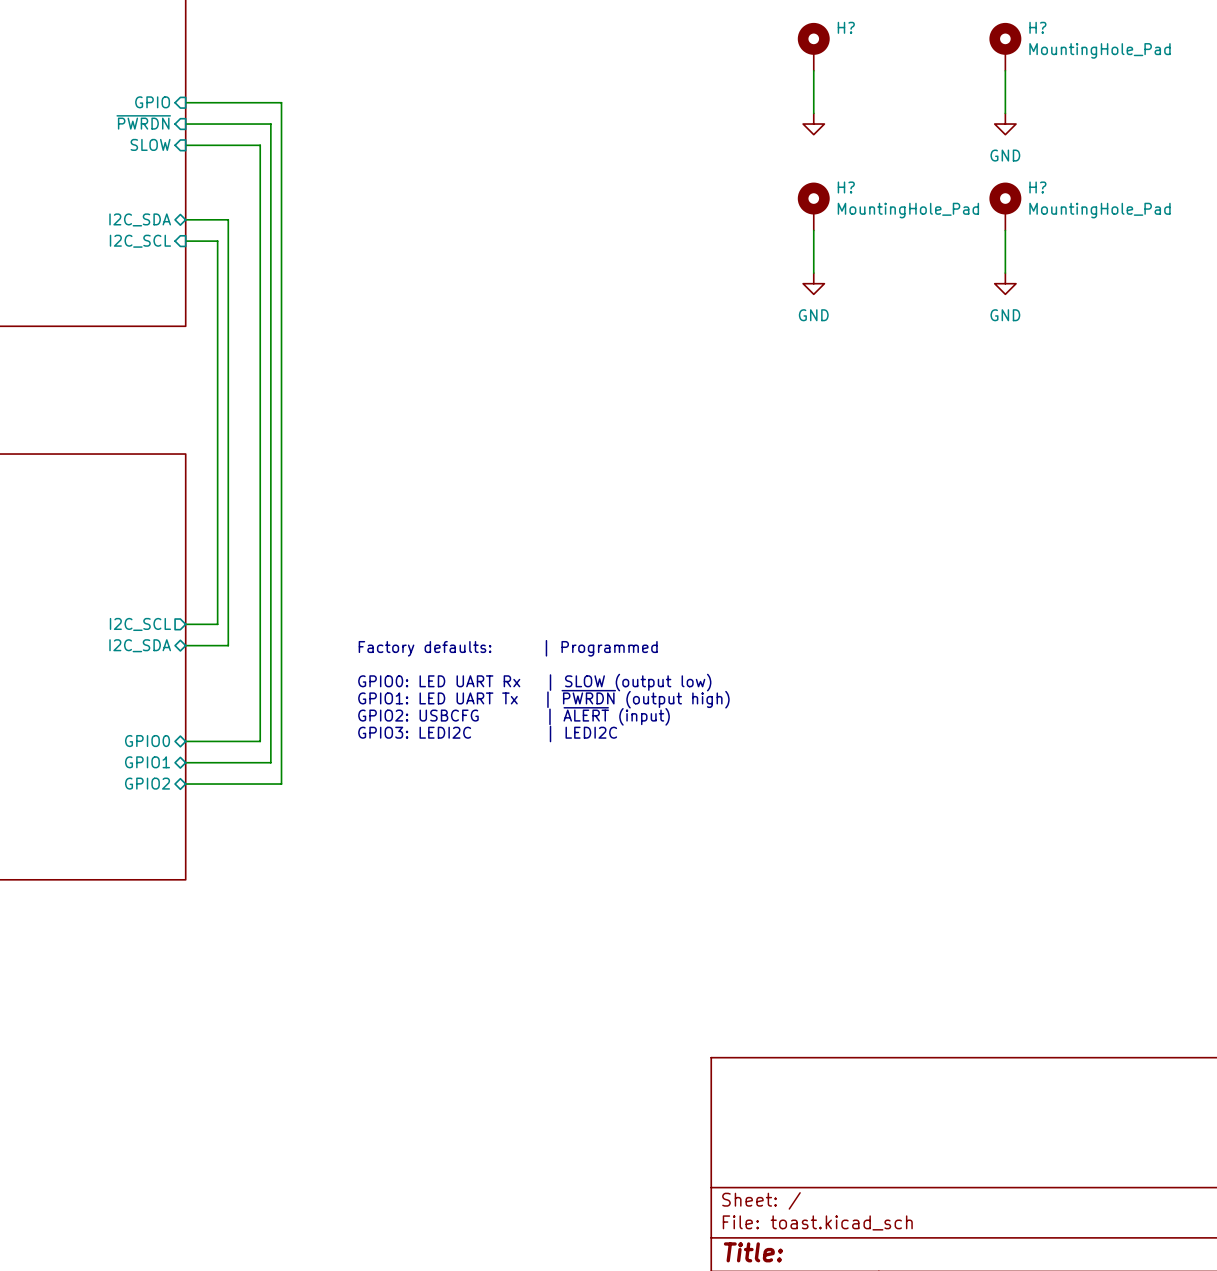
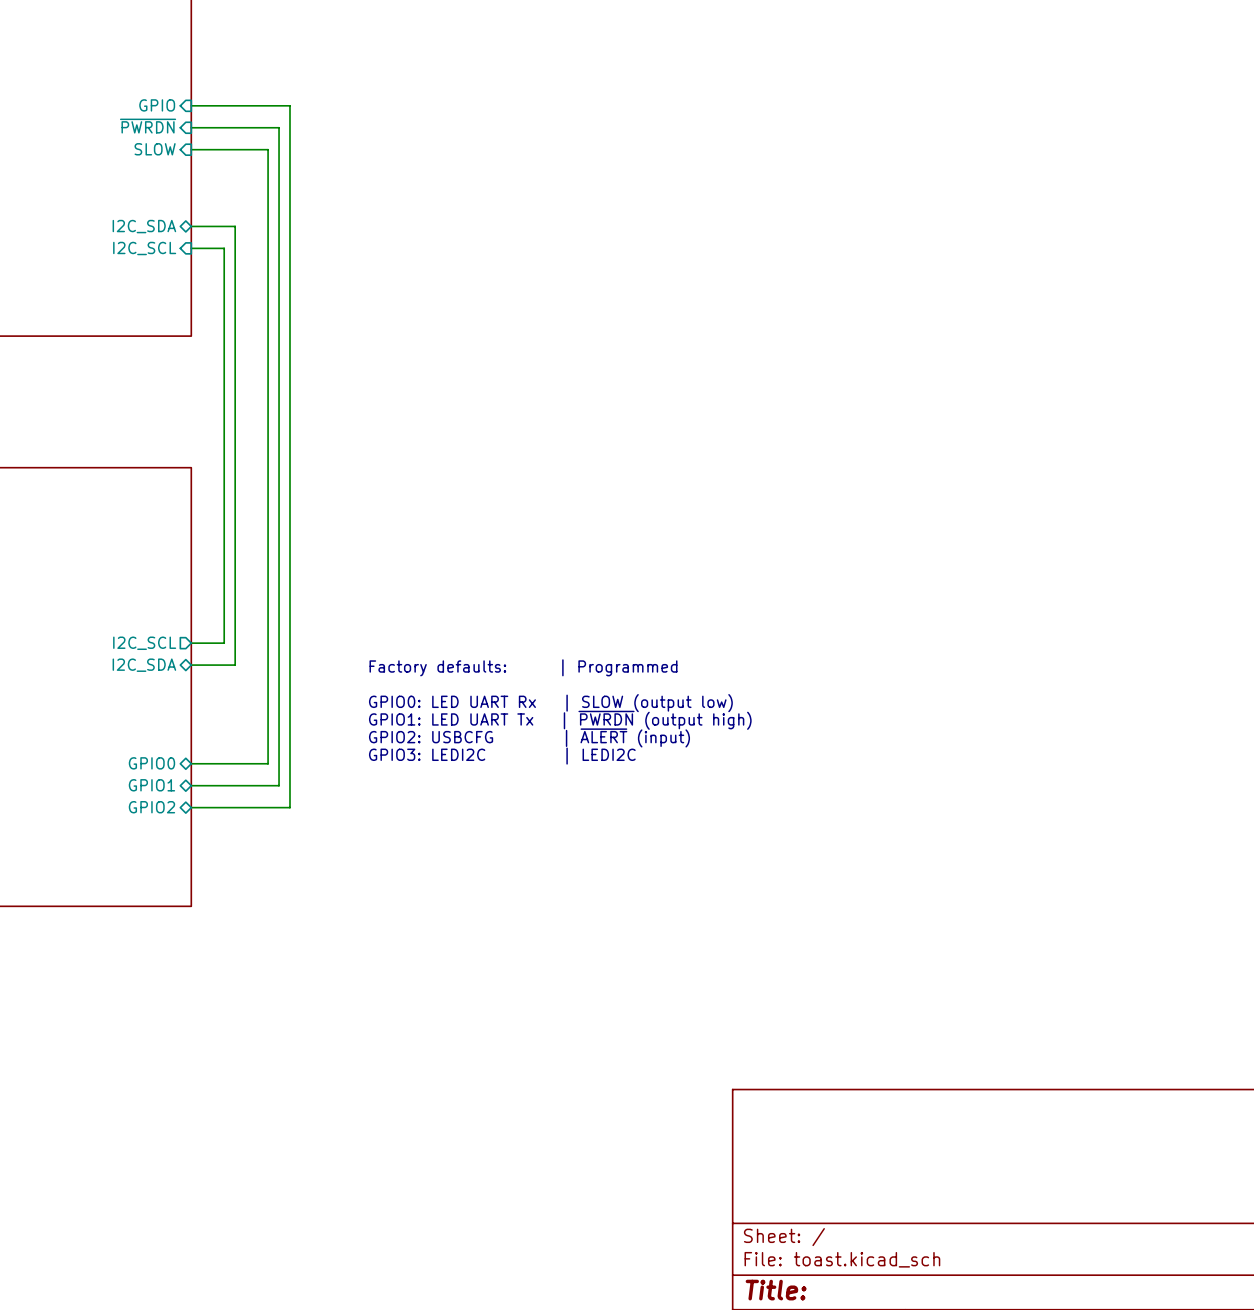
H?: (813, 46) -> none
H?: MountingHole_Pad (1005, 46) -> none
wire: (813, 70) (813, 113) -> none
wire: (1005, 70) (1005, 113) -> none
power symbol: (813, 124) -> none
power symbol: GND (1005, 124) -> none
H?: MountingHole_Pad (813, 206) -> none
H?: MountingHole_Pad (1005, 206) -> none
wire: (813, 230) (813, 273) -> none
wire: (1005, 230) (1005, 273) -> none
power symbol: GND (813, 283) -> none
power symbol: GND (1005, 283) -> none

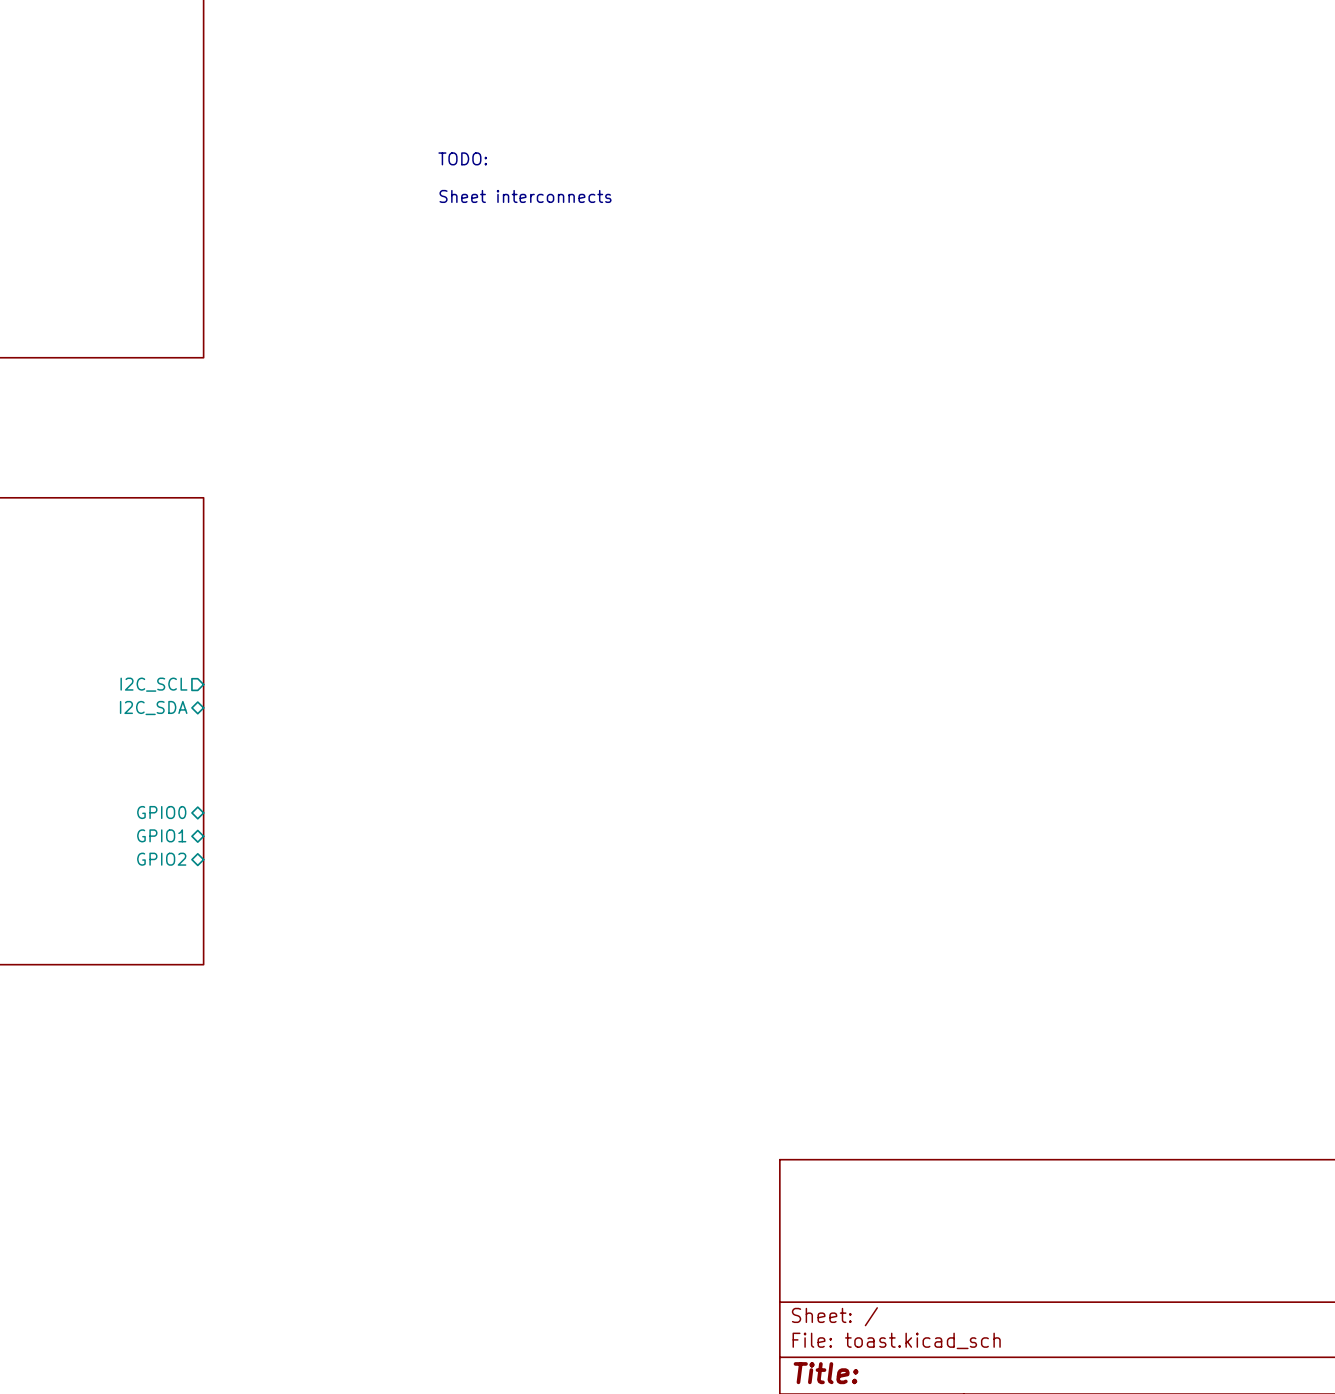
sheet pin: GPIO (157, 105) -> none
wire: (191, 105) (289, 105) (289, 807) (191, 807) -> none
sheet pin: ~{PWRDN} (148, 126) -> none
wire: (191, 127) (279, 127) (279, 785) (191, 785) -> none
sheet pin: SLOW (155, 149) -> none
wire: (191, 149) (268, 149) (268, 763) (191, 763) -> none
text: none -> TODO: (462, 158)
text: none -> Sheet interconnects (525, 196)
sheet pin: I2C_SDA (144, 226) -> none
wire: (191, 226) (235, 226) (235, 665) (191, 665) -> none
sheet pin: I2C_SCL (144, 248) -> none
wire: (191, 248) (224, 248) (224, 643) (191, 643) -> none
text: Factory defaults: | Programmed (523, 667) -> none
text: GPIO0: LED UART Rx | SLOW (output low) (550, 703) -> none
text: GPIO1: LED UART Tx | ~{PWRDN} (output high) (560, 720) -> none
text: GPIO2: USBCFG | ~{ALERT} (input) (529, 737) -> none
text: GPIO3: LEDI2C | LEDI2C (502, 756) -> none

